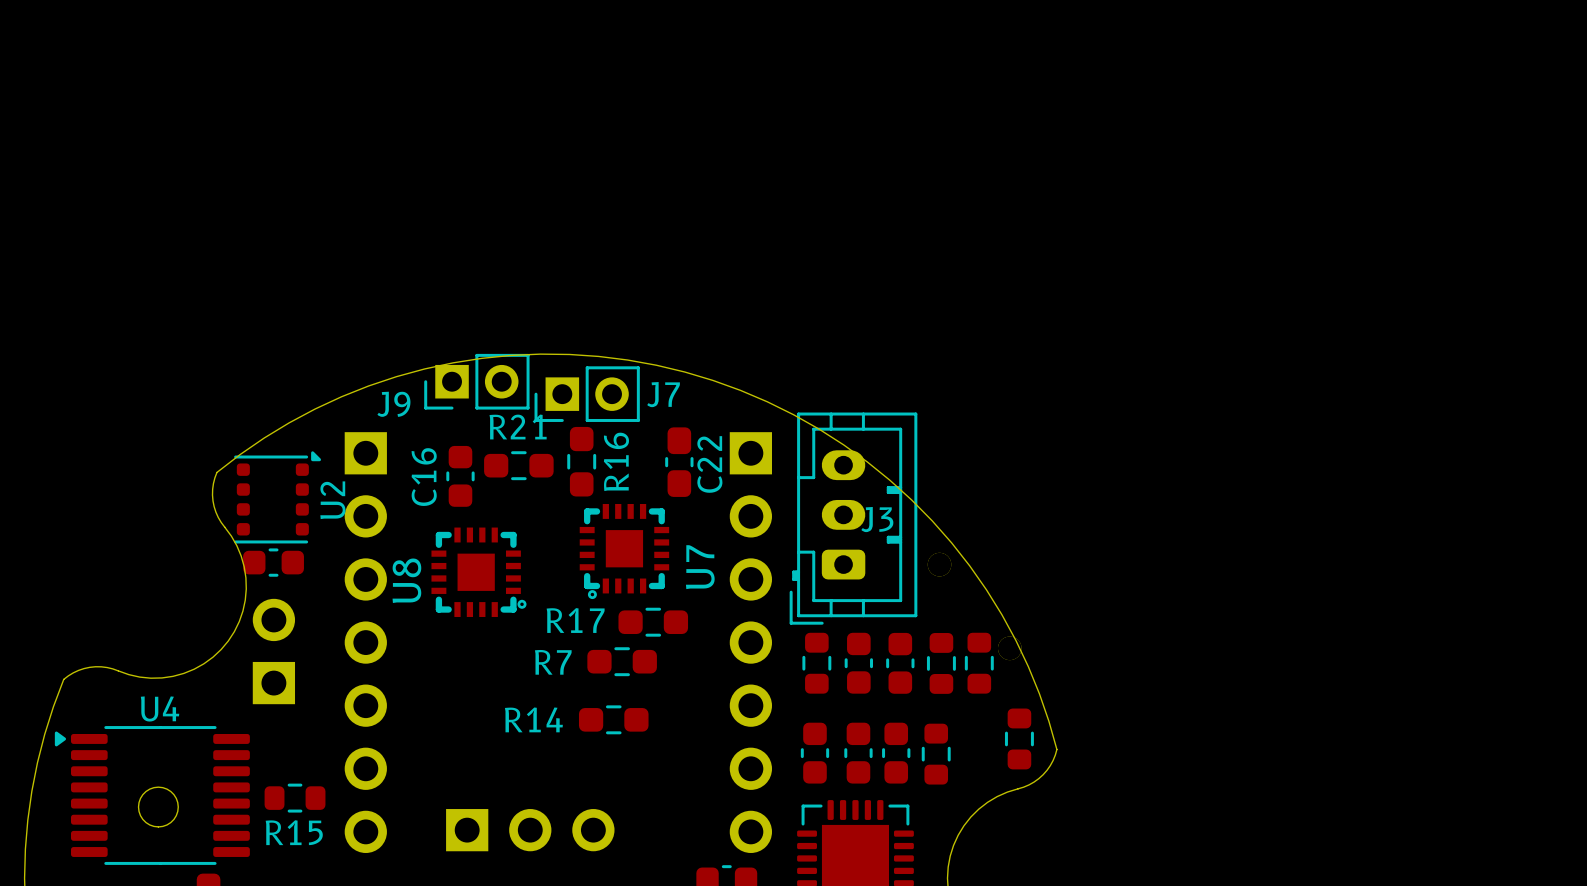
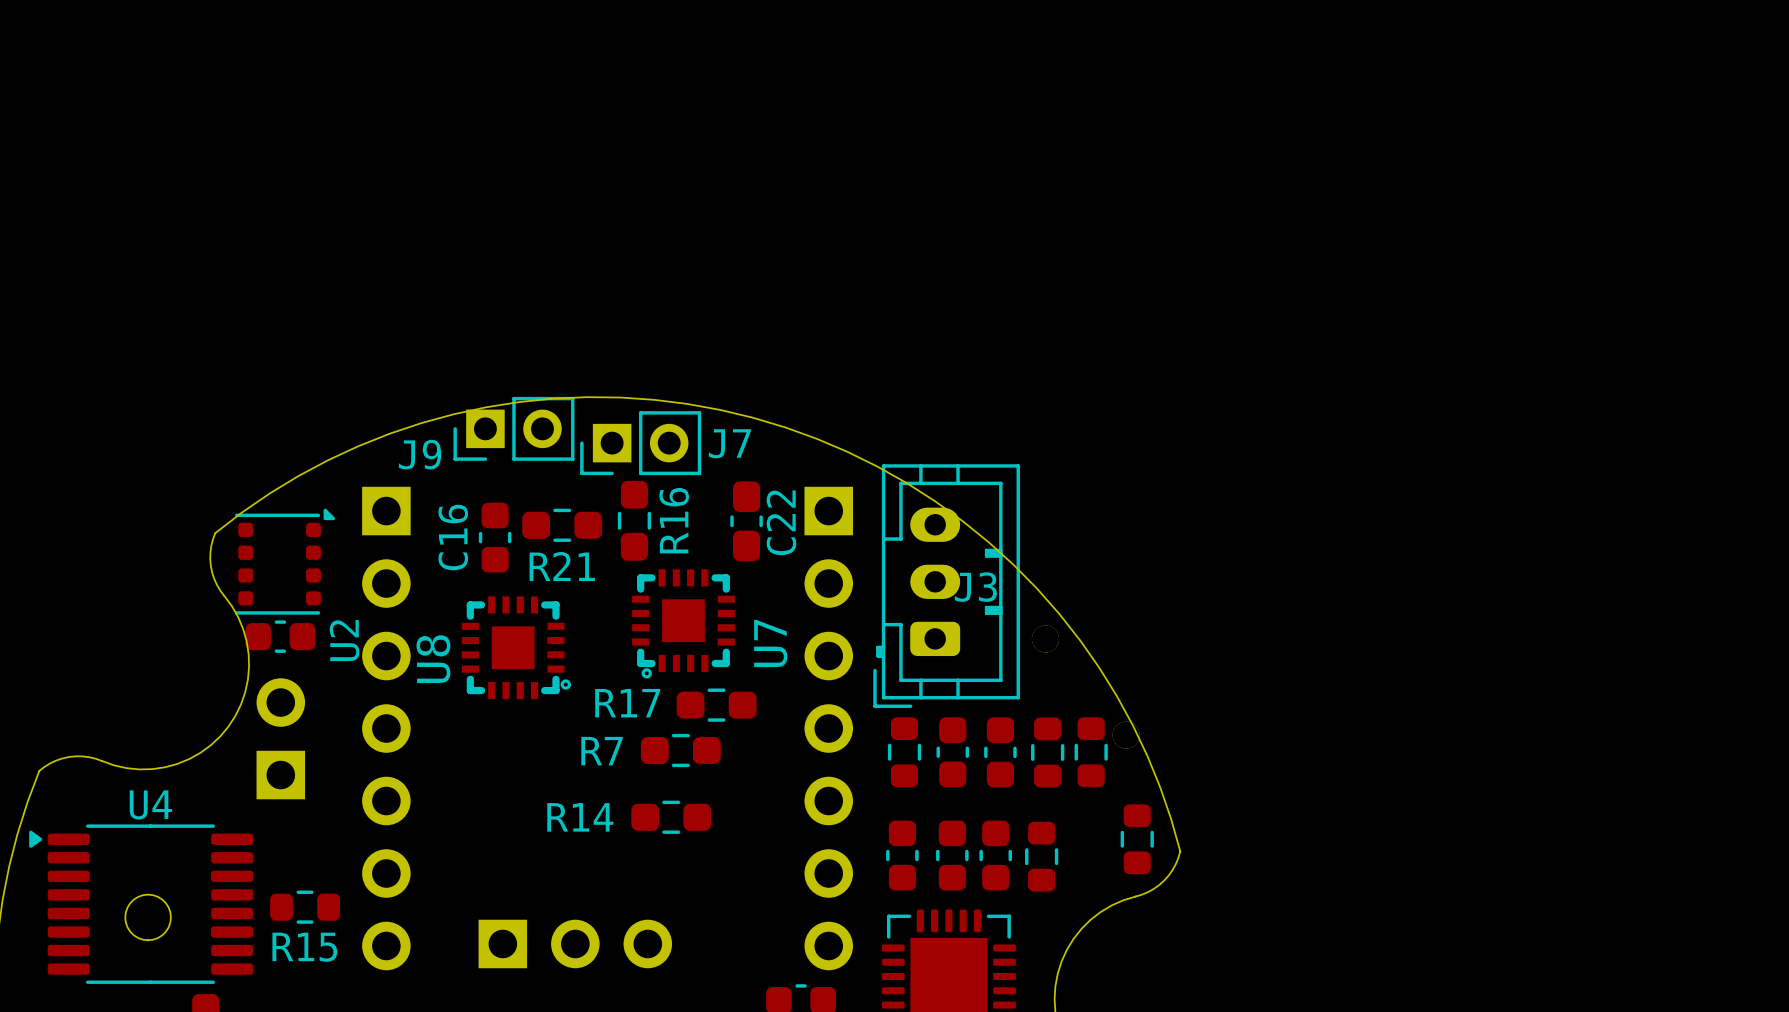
R21 name position: R21 (518, 427) -> R21 (562, 566)
U2 name position: U2 (332, 500) -> U2 (344, 640)

